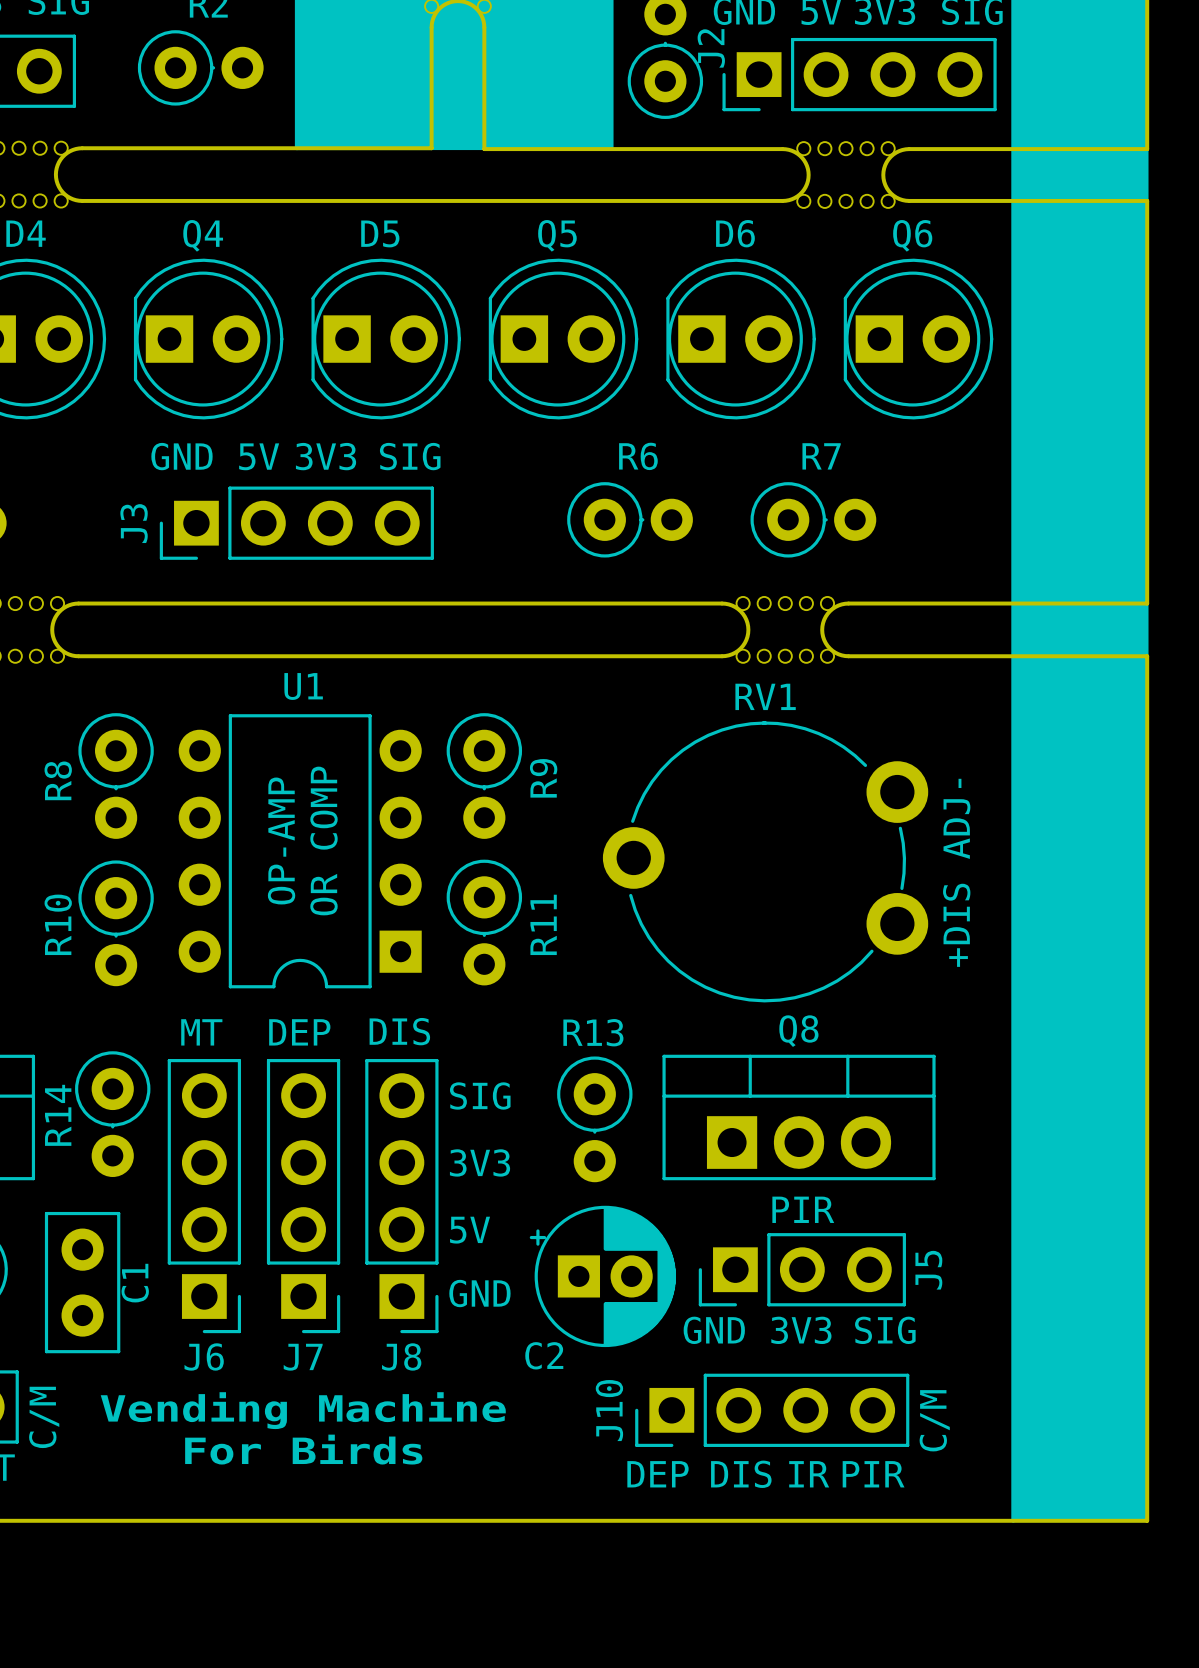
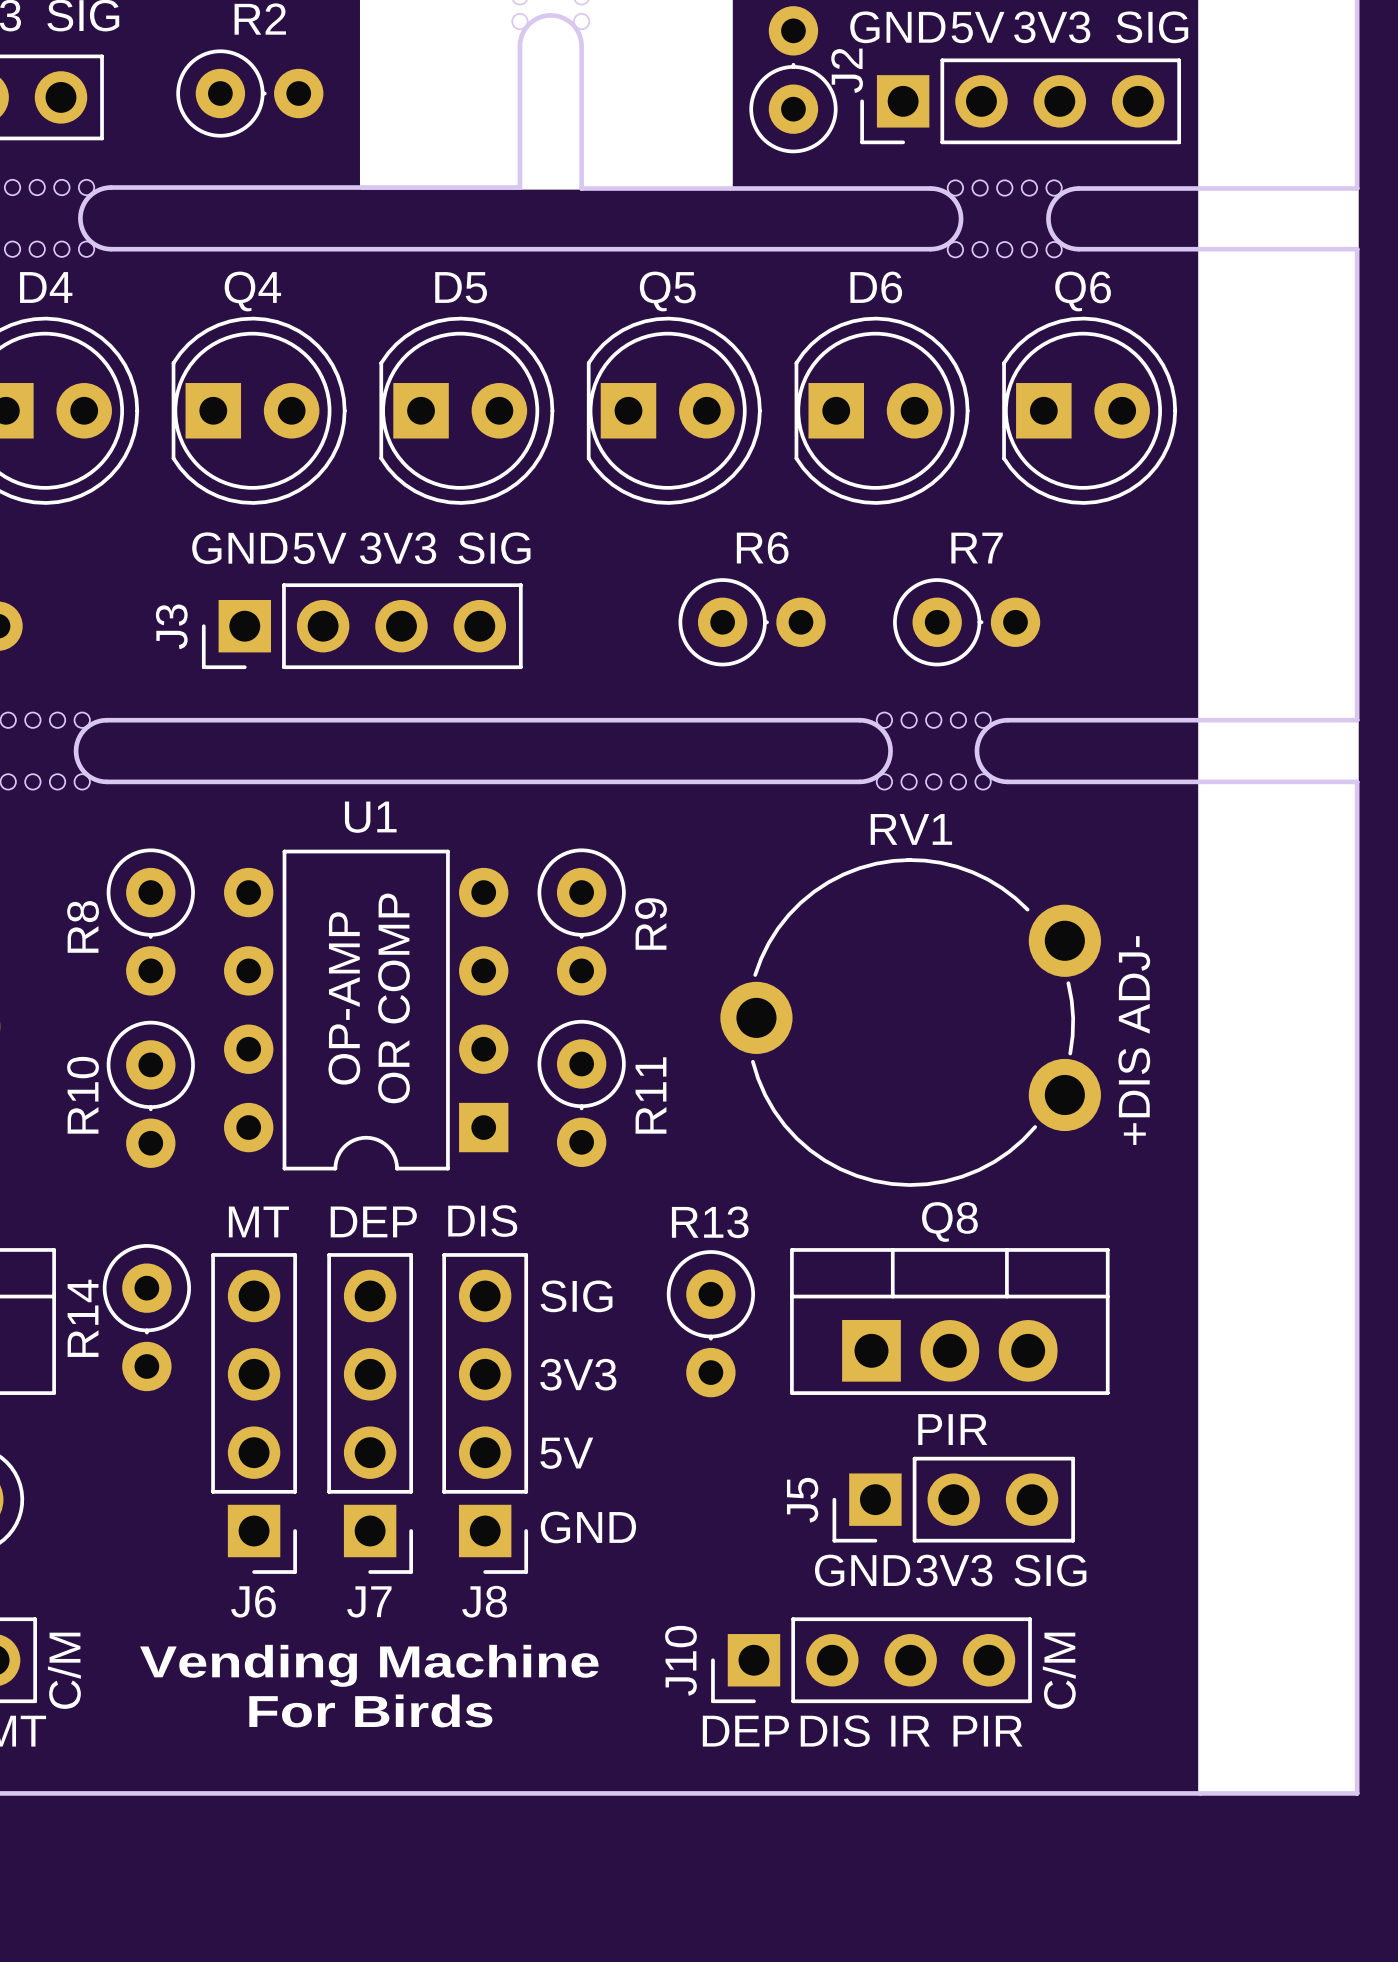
J5 name position: J5 (928, 1270) -> J5 (802, 1500)
C2: (602, 1276) -> none
C1: (82, 1282) -> none
J10 position: (772, 1410) -> (871, 1660)
text position: C/M (934, 1420) -> C/M (1059, 1670)
text: none -> IR (910, 1731)
text position: DEP (657, 1474) -> DEP (745, 1731)
text position: DIS (741, 1474) -> DIS (835, 1731)
text: IR (809, 1474) -> PIR (987, 1731)
text: PIR (873, 1474) -> none

